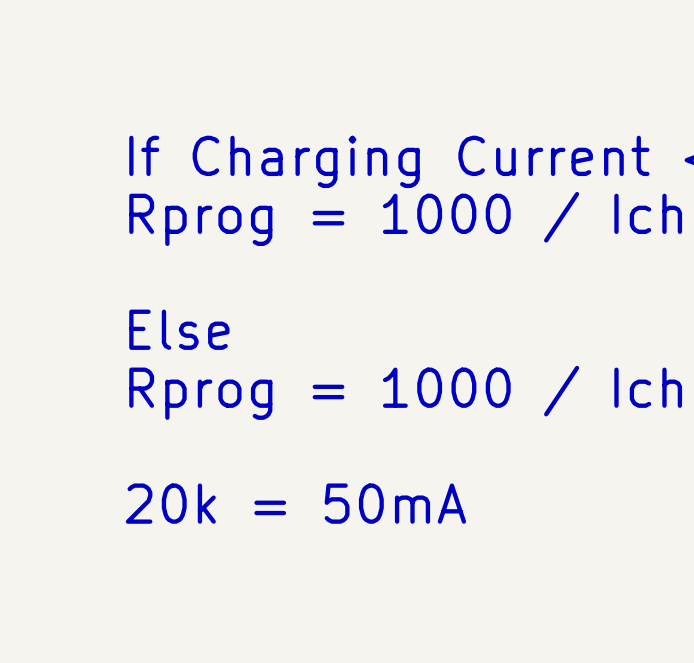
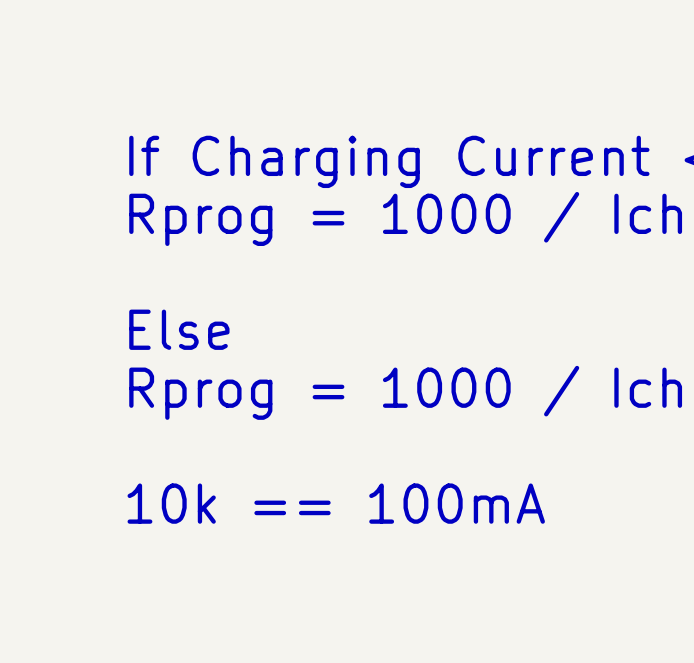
text: 20k = 50mA (295, 503) -> 10k == 100mA (336, 503)

